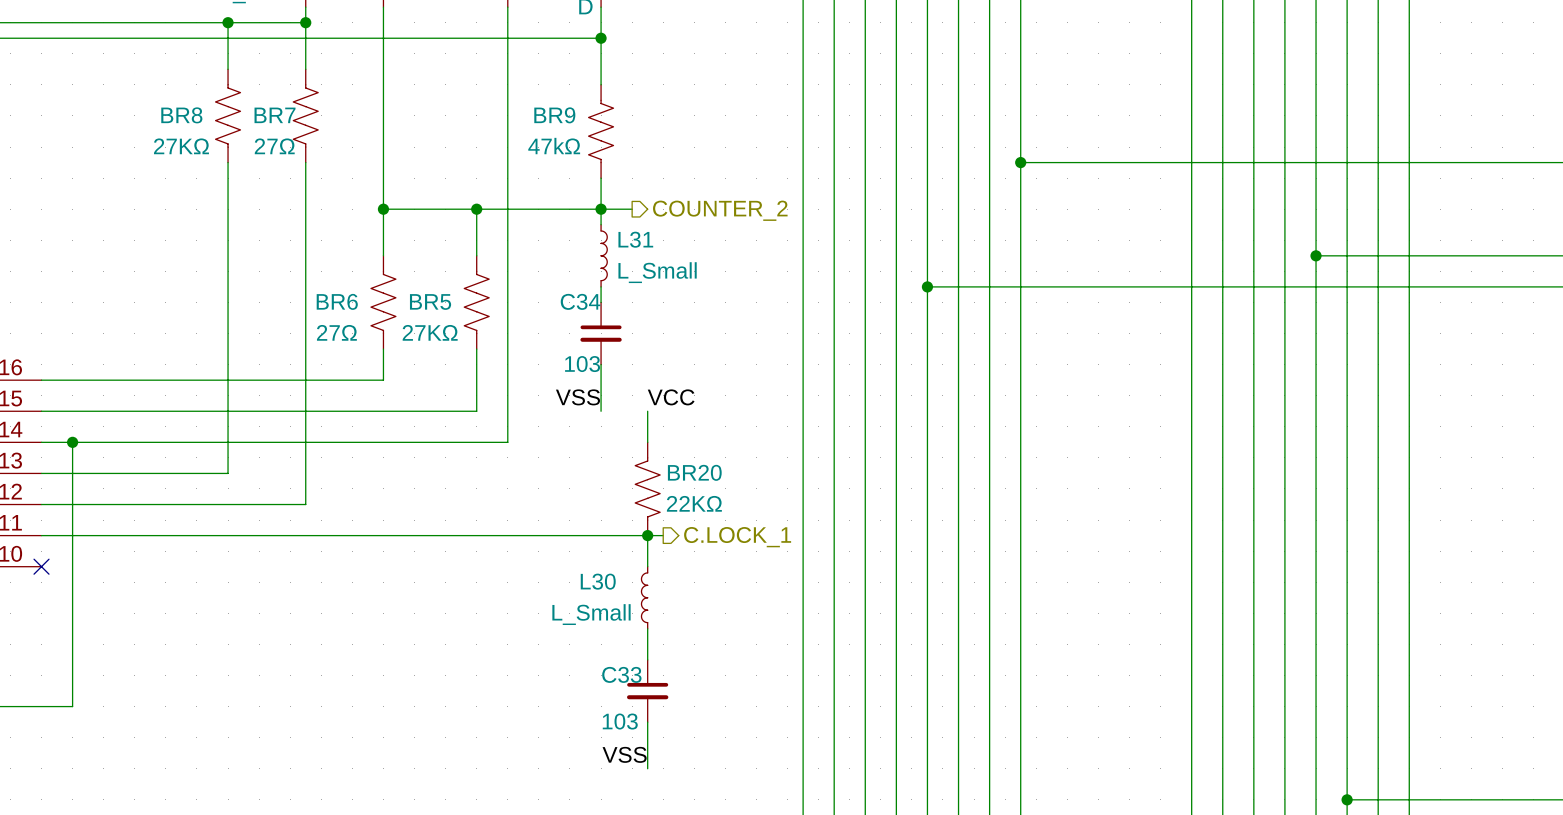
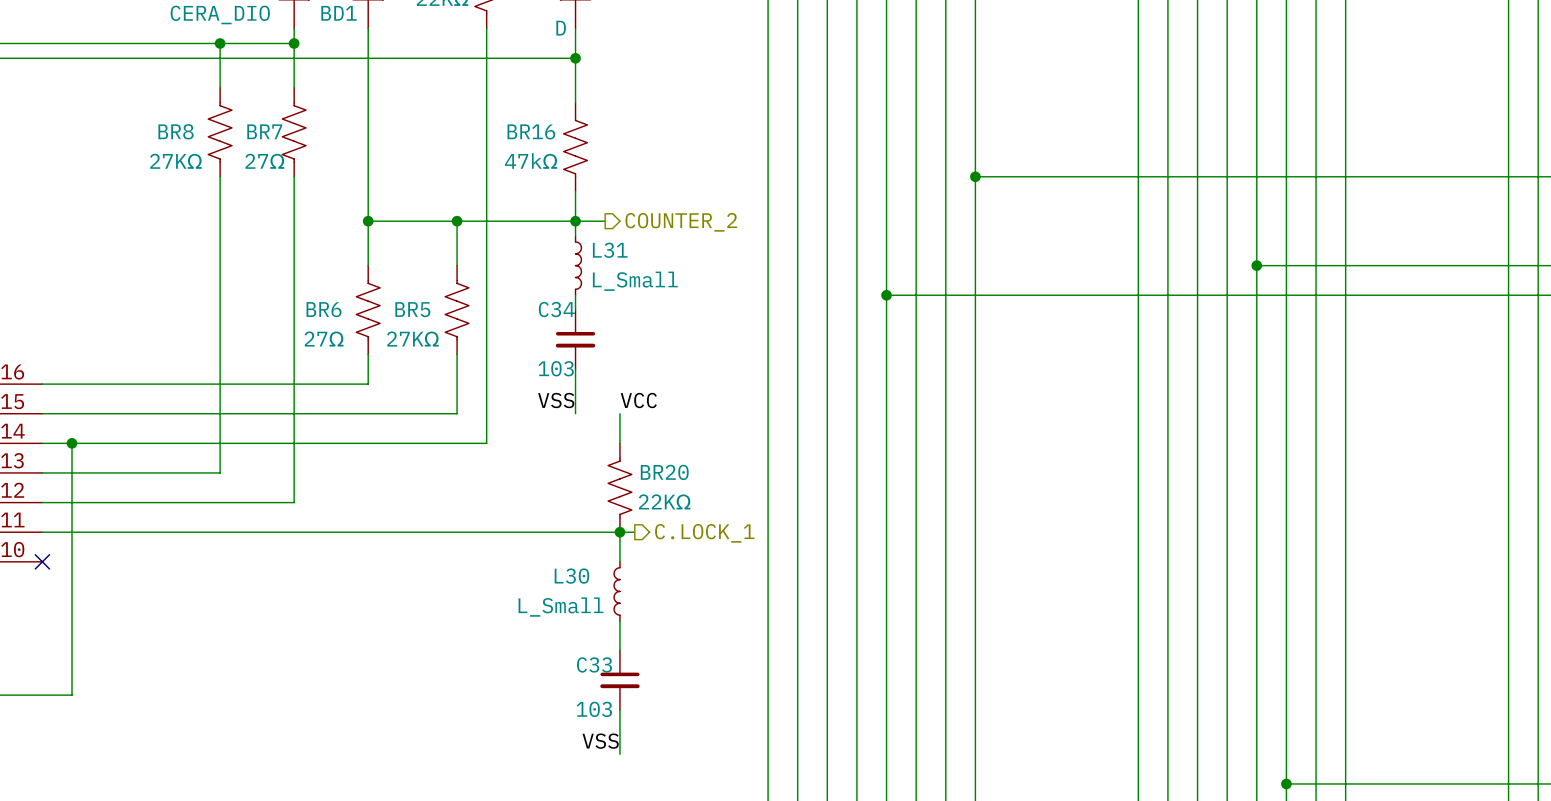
BR9 name: BR9 (554, 115) -> BR16 (531, 131)

